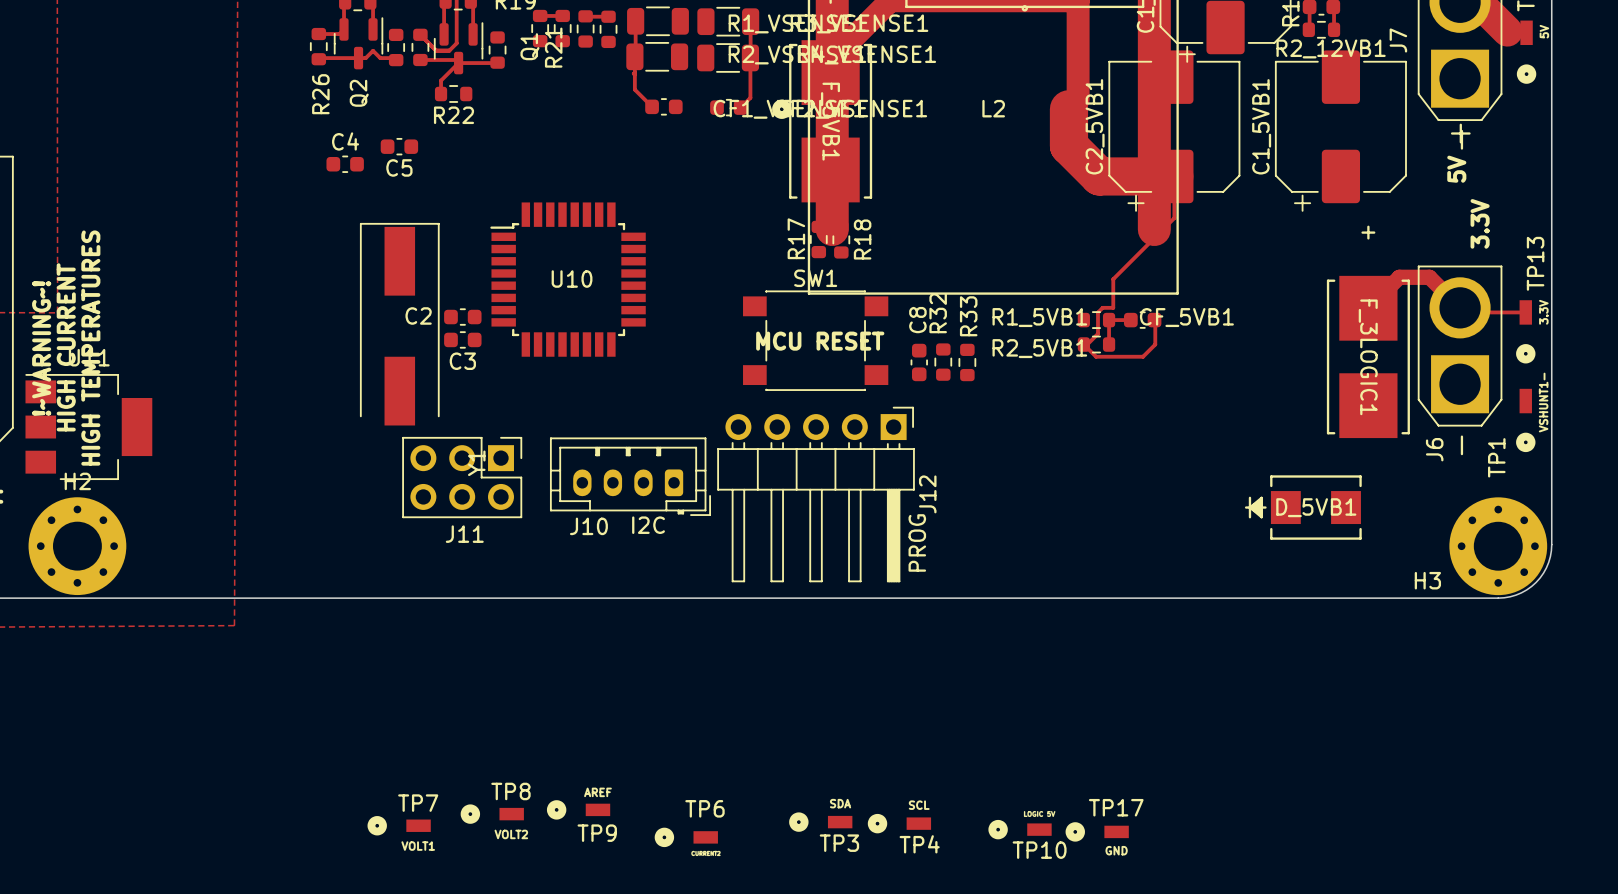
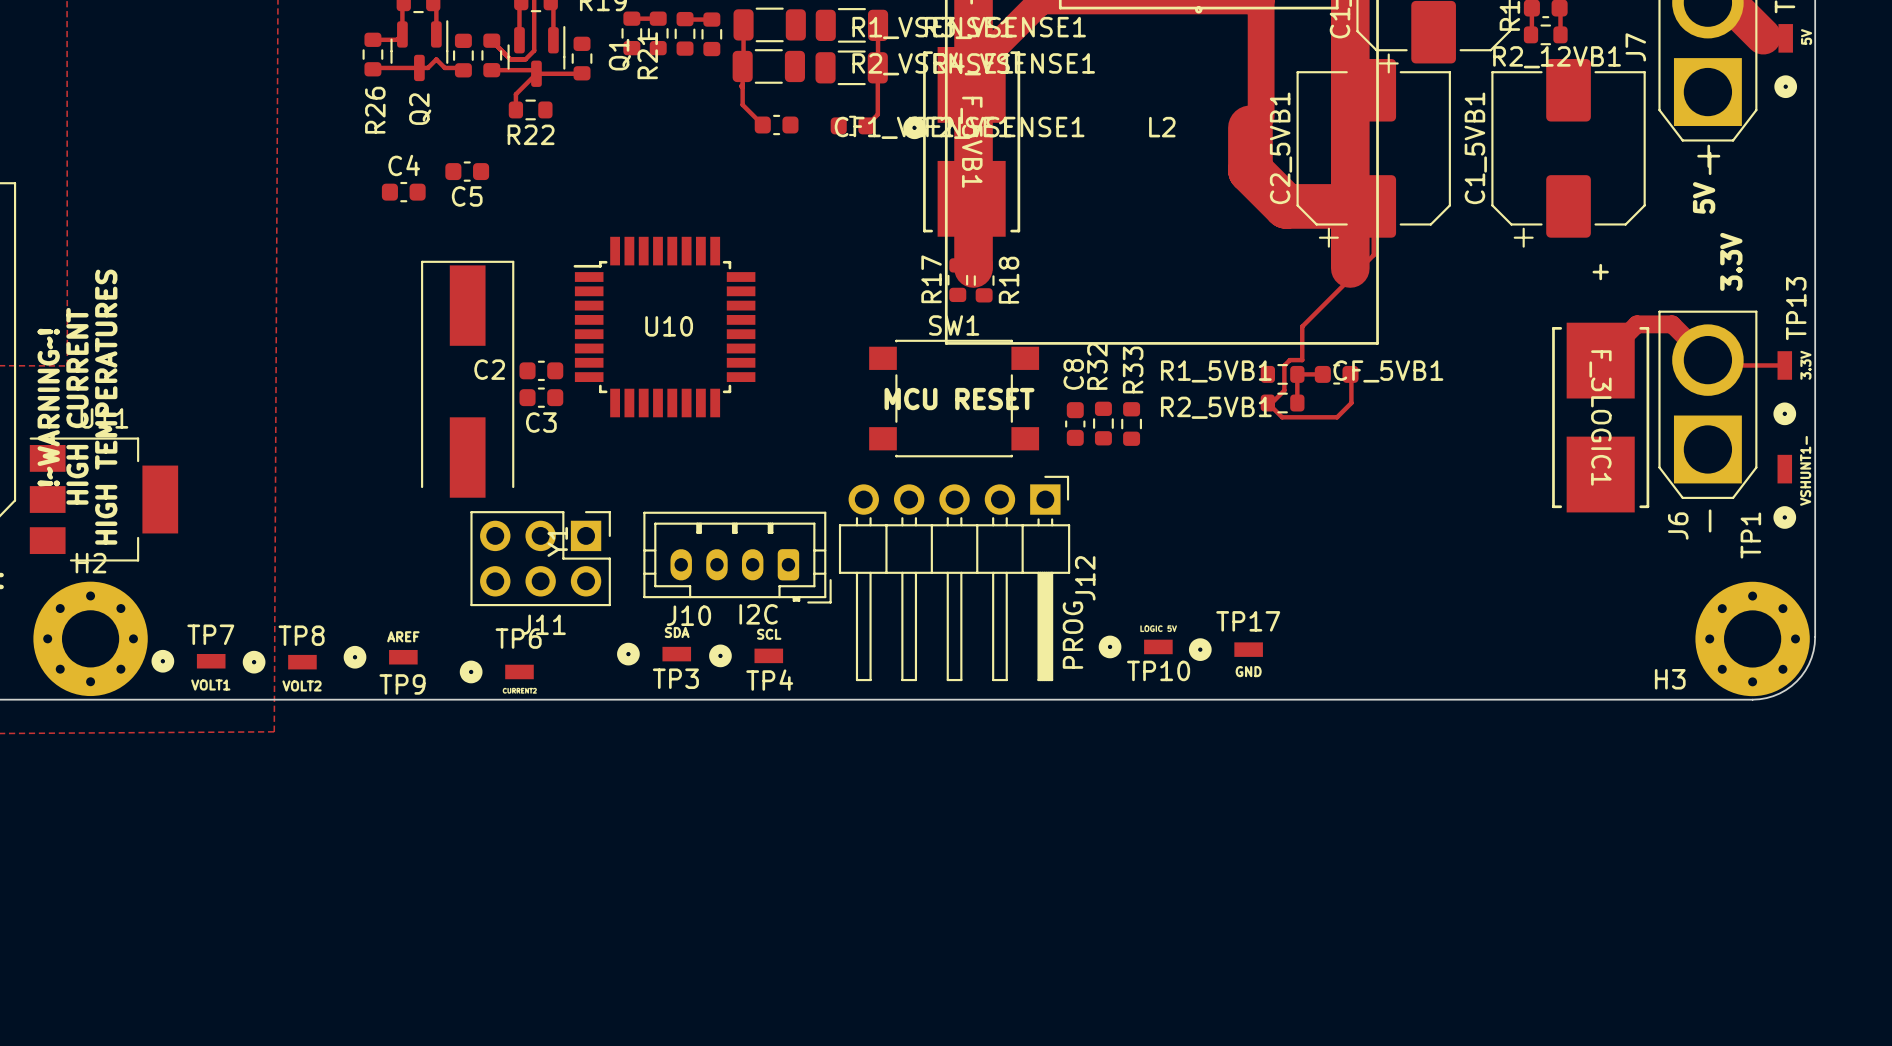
D_5VB1: (1303, 507) -> none
TP9 position: (578, 809) -> (380, 657)
TP8 position: (492, 814) -> (279, 662)
TP3 position: (820, 822) -> (654, 654)
TP4 position: (899, 823) -> (746, 655)
TP7 position: (399, 825) -> (188, 661)
TP10 position: (1020, 829) -> (1135, 646)
TP17 position: (1097, 831) -> (1225, 649)
TP6 position: (686, 837) -> (496, 671)

